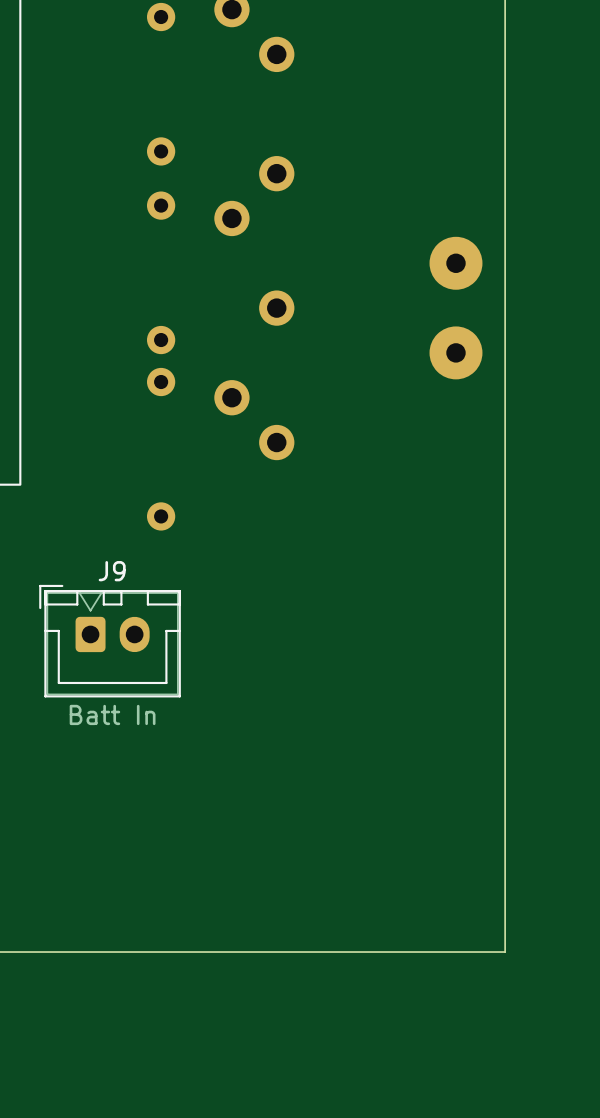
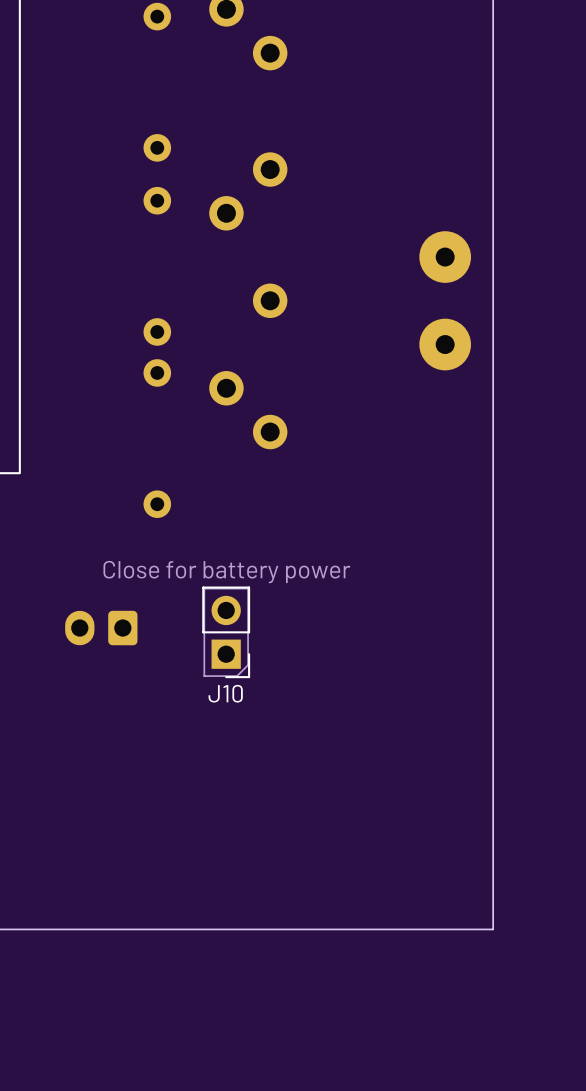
J9 side: top (110, 641) -> bottom (101, 628)
J10: none -> Close for battery power (226, 632)

